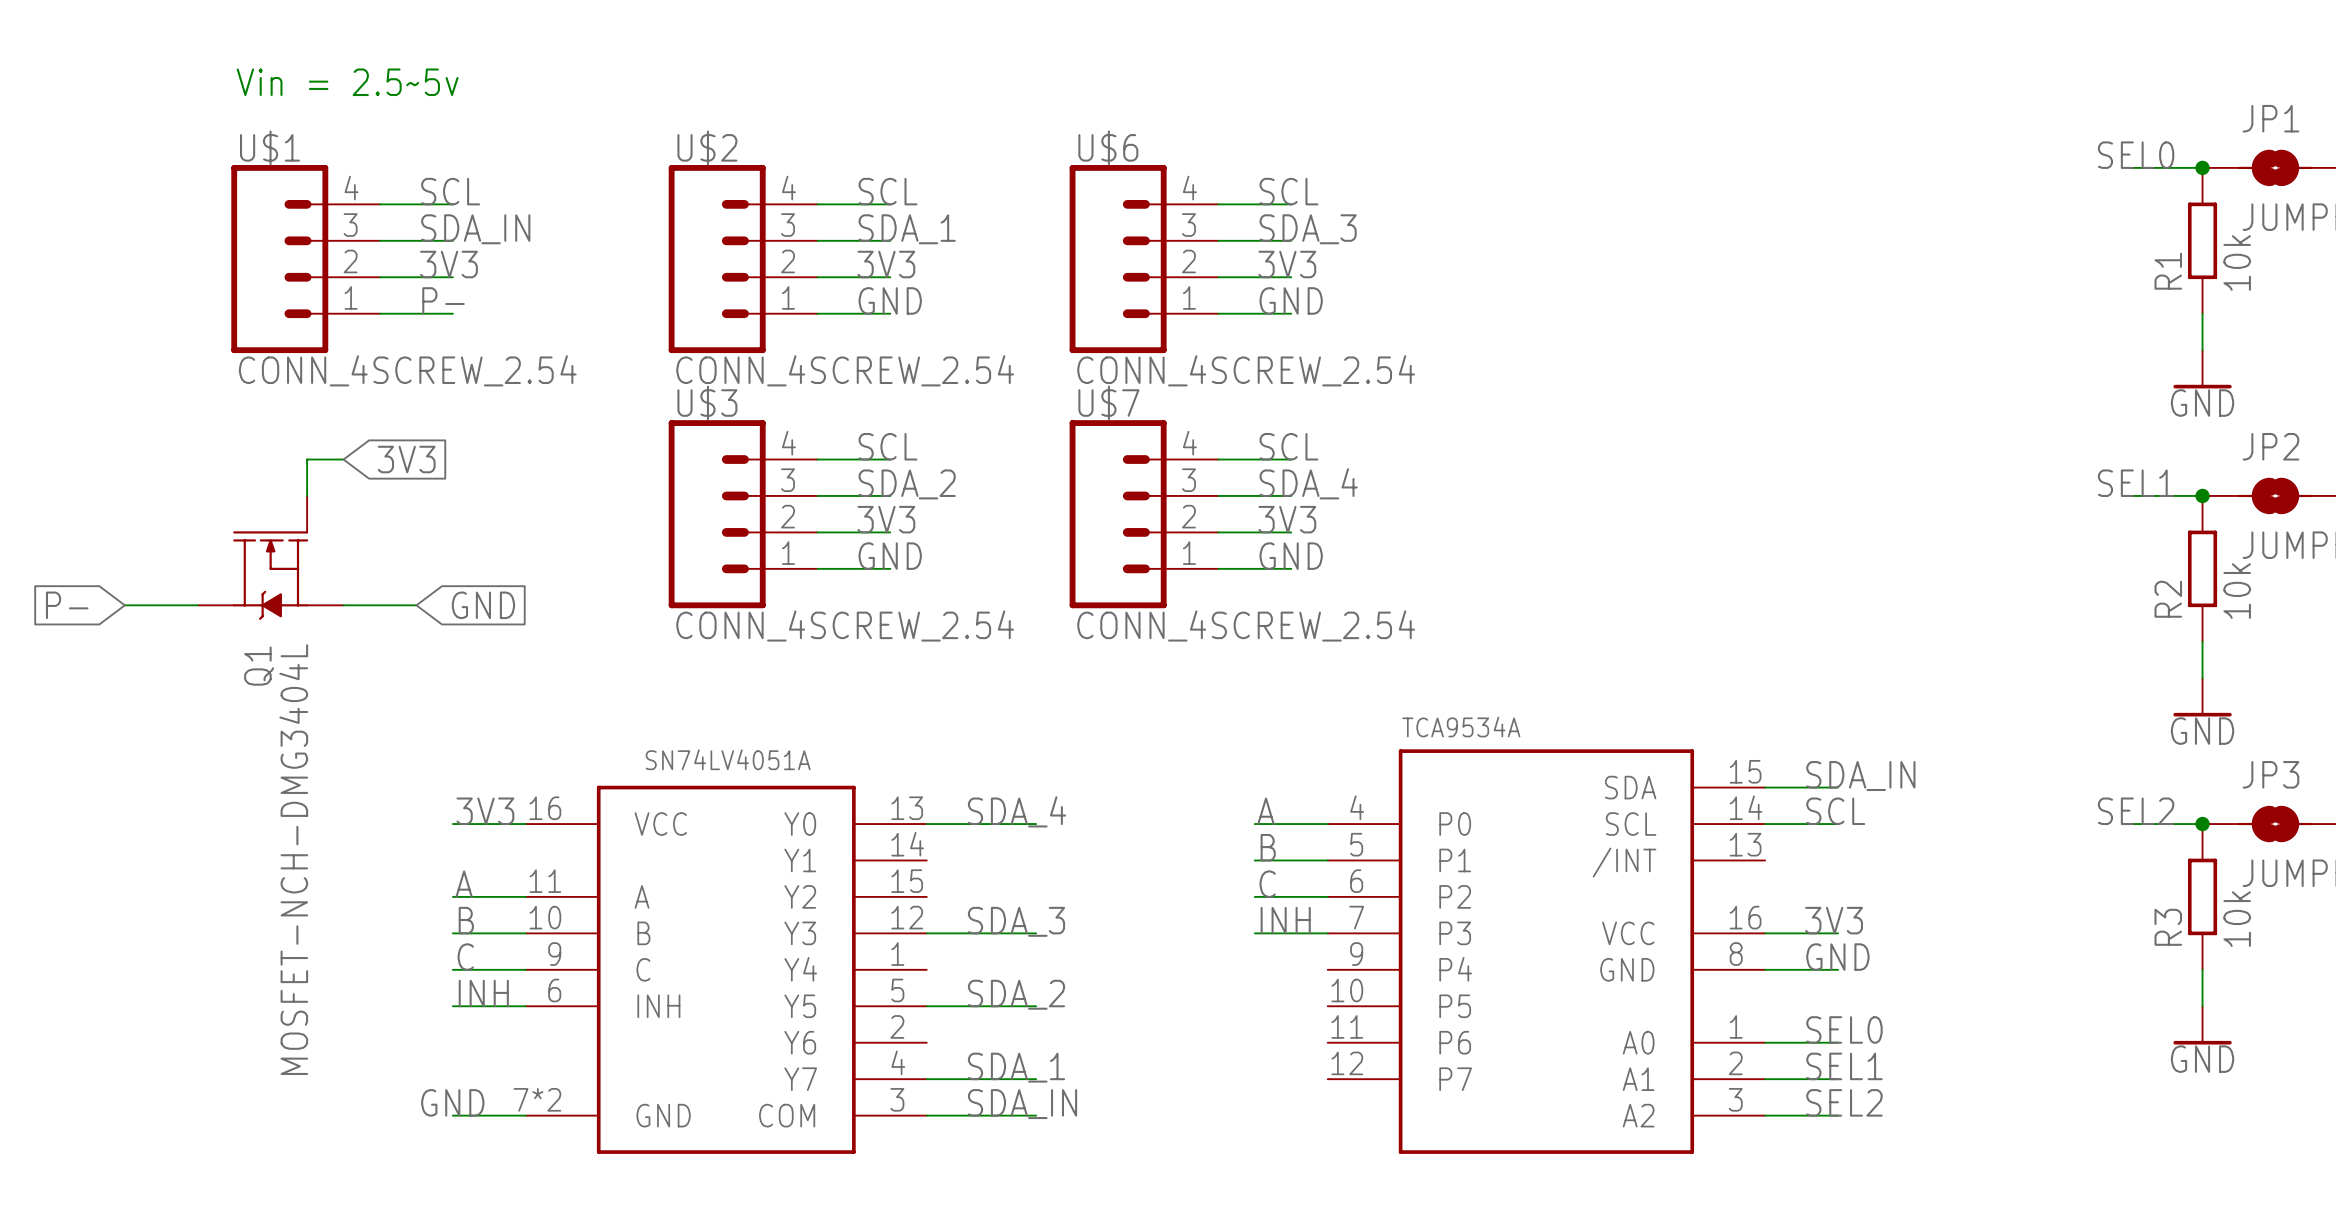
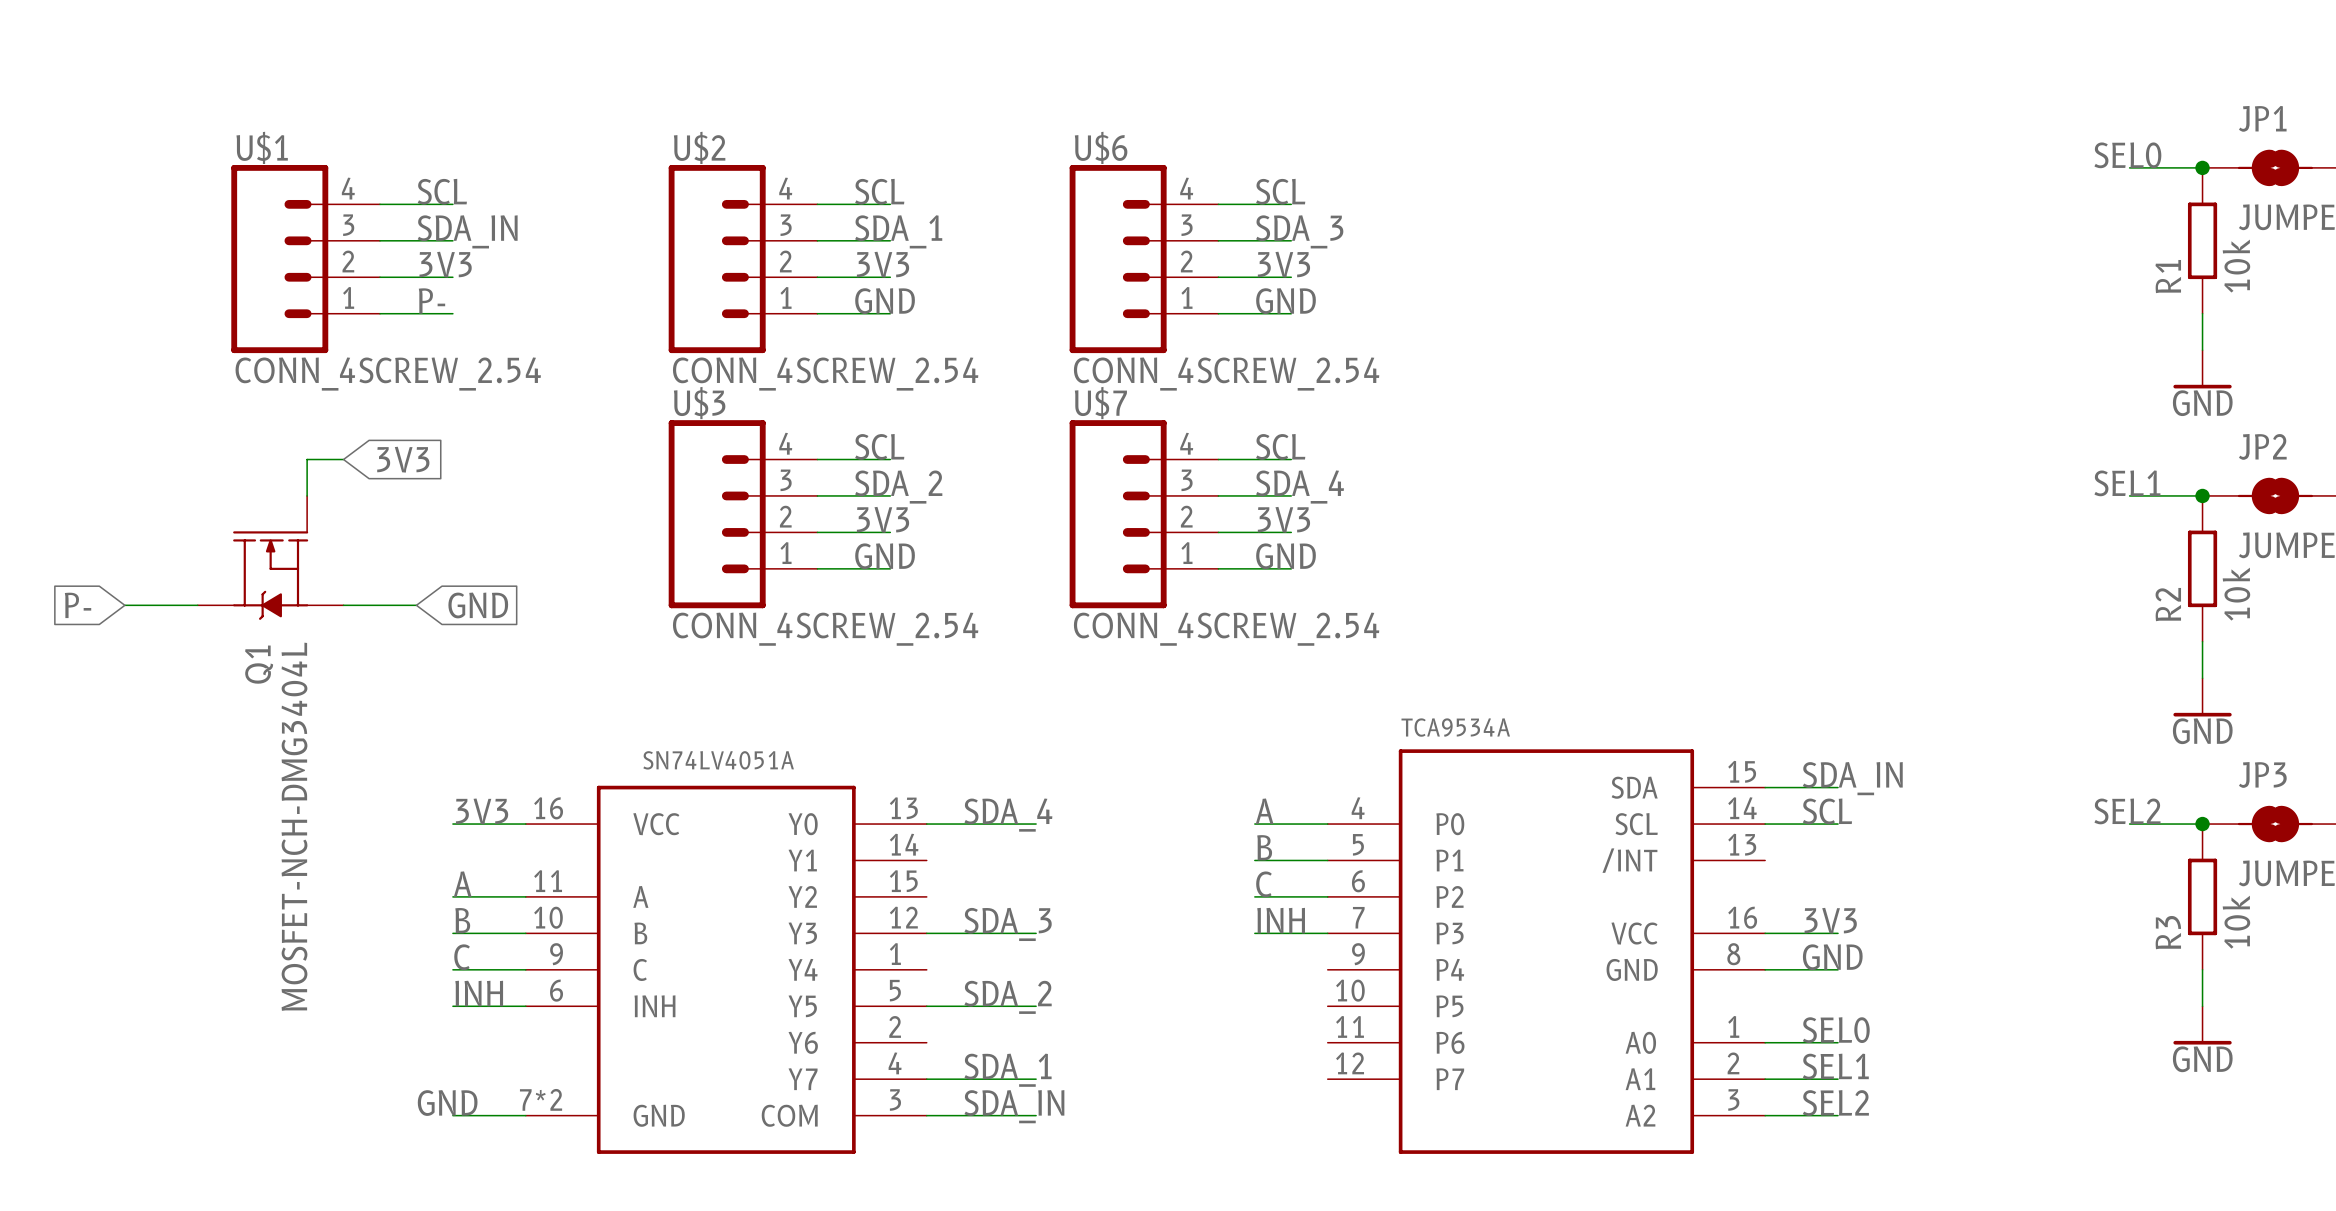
text: Vin = 2.5~5v (347, 82) -> none

